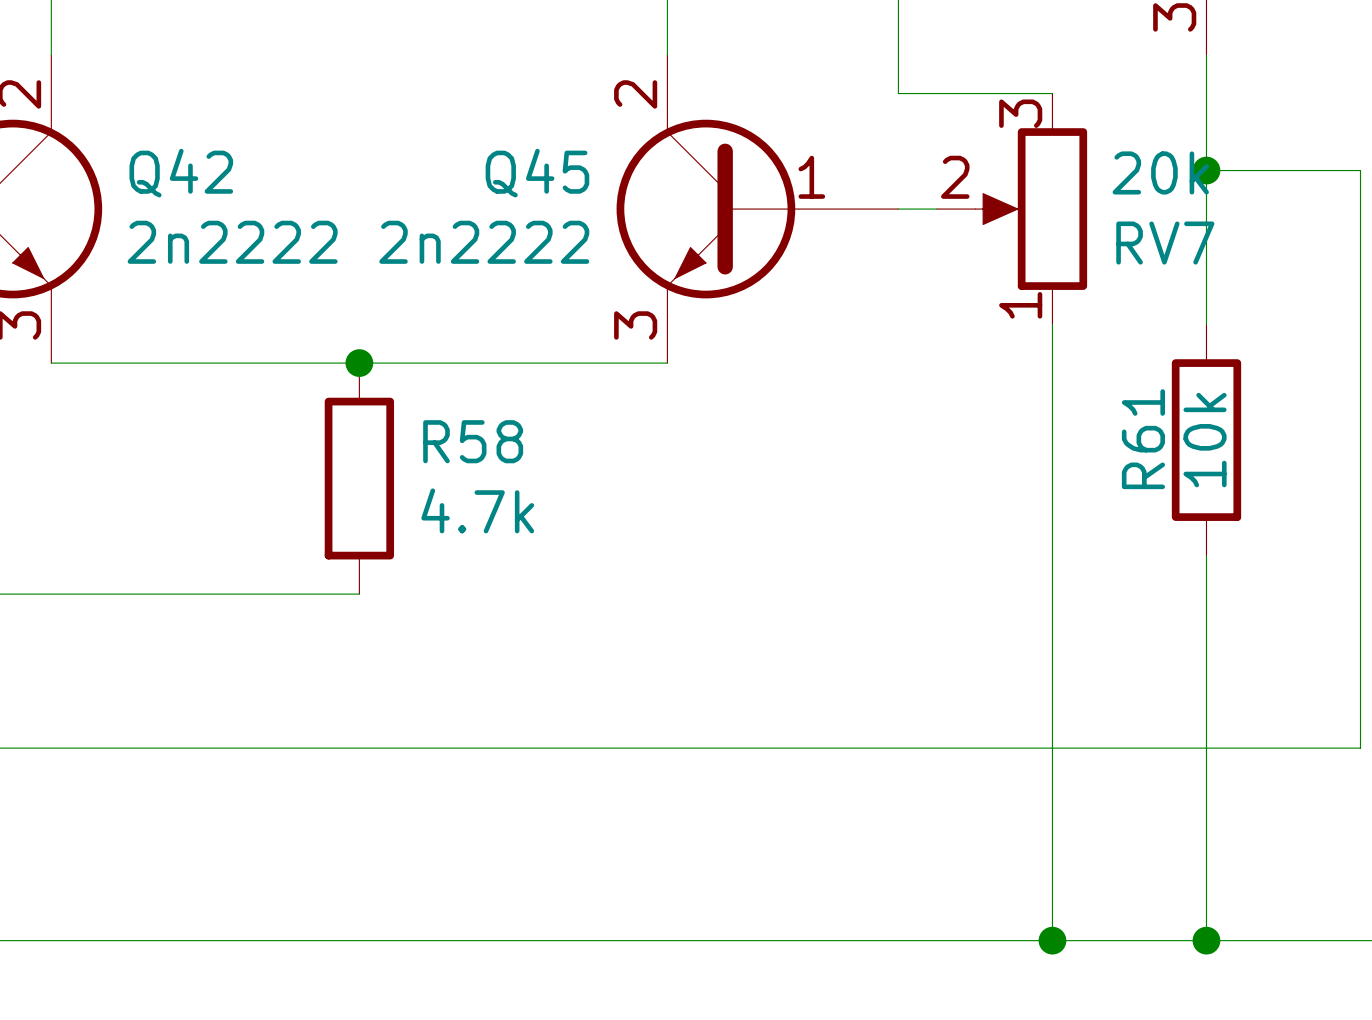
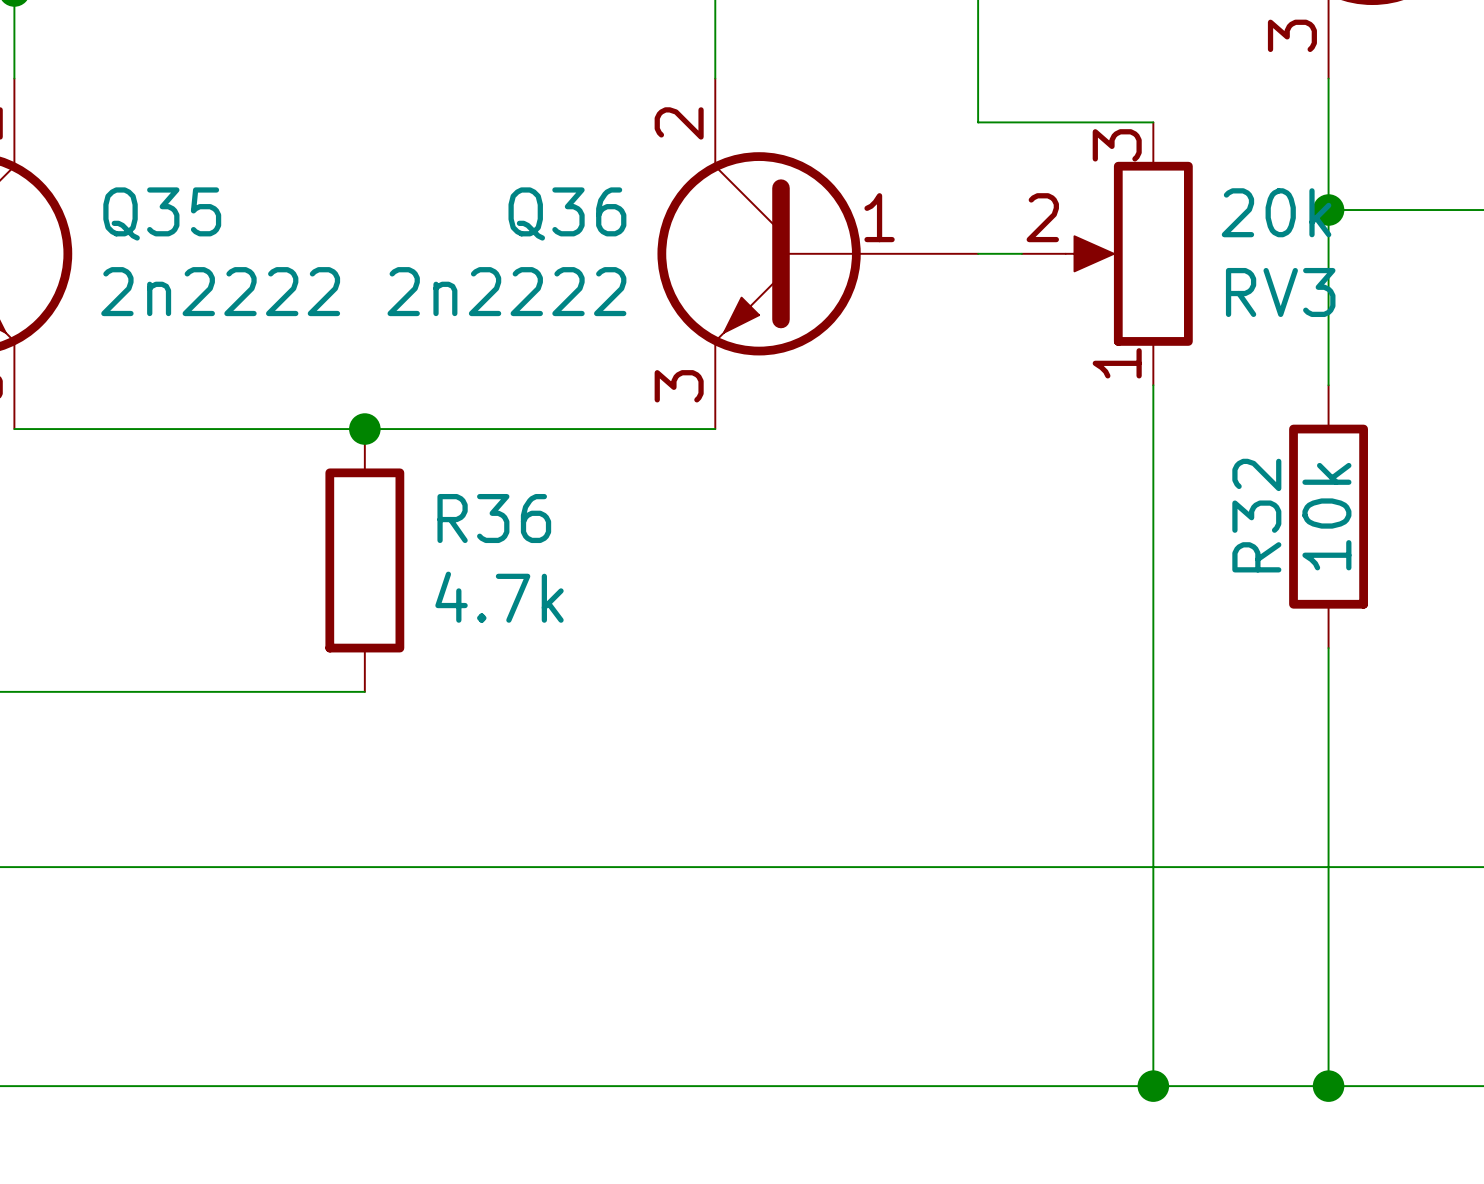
Q42 name: Q42 (181, 173) -> Q35 (162, 213)
Q45 name: Q45 (537, 173) -> Q36 (567, 213)
RV7 name: RV7 (1165, 243) -> RV3 (1280, 292)
R61 name: R61 (1143, 439) -> R32 (1256, 515)
R58 name: R58 (473, 441) -> R36 (494, 518)

